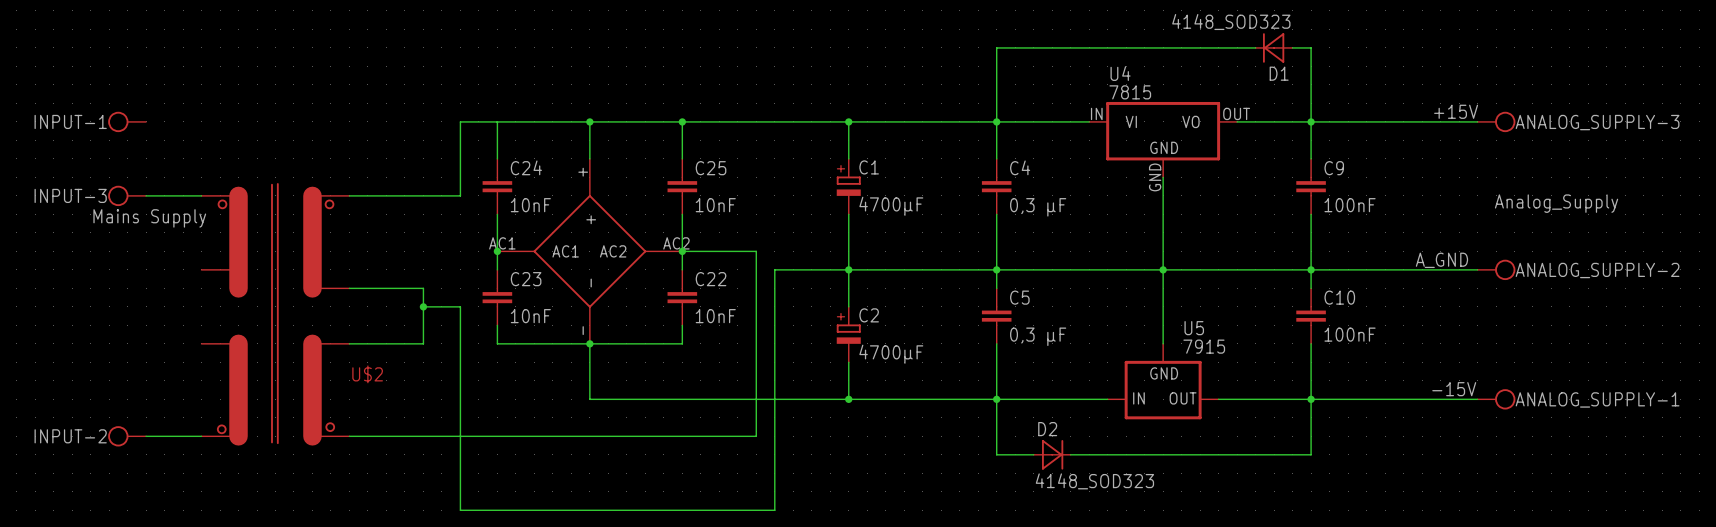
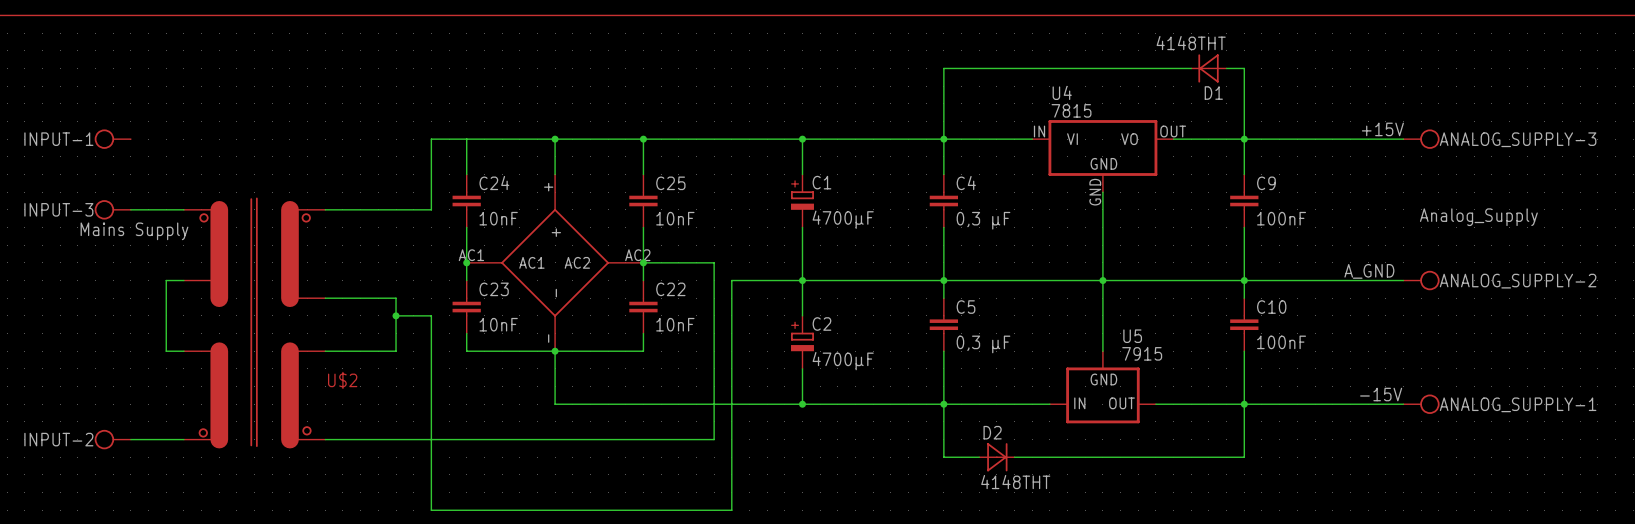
D1 value: 4148_SOD323 (1231, 22) -> 4148THT (1191, 43)
wire: none -> (183, 280) (166, 280) (166, 351) (183, 351)
D2 value: 4148_SOD323 (1094, 481) -> 4148THT (1015, 482)

